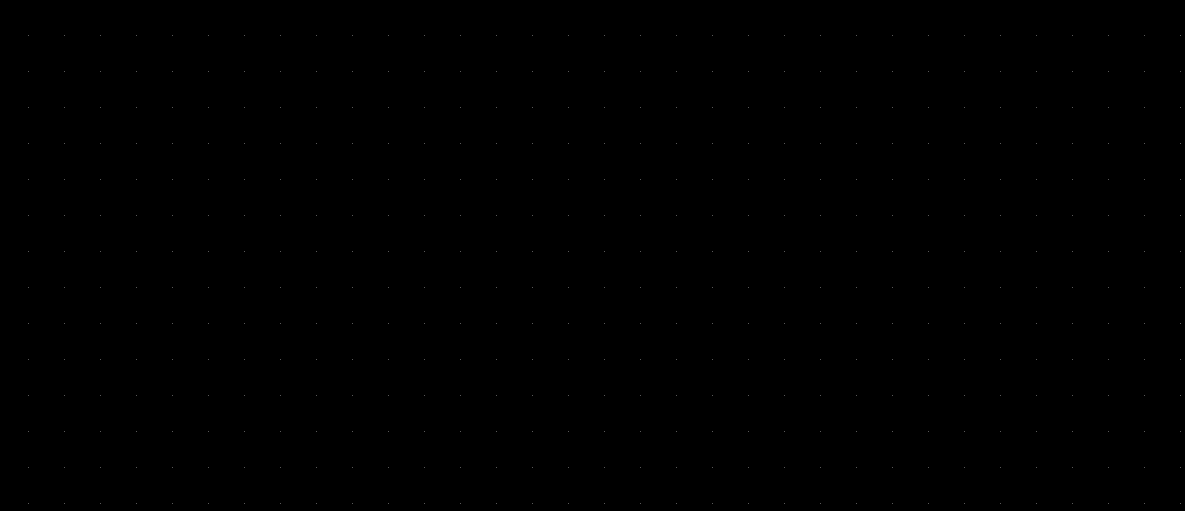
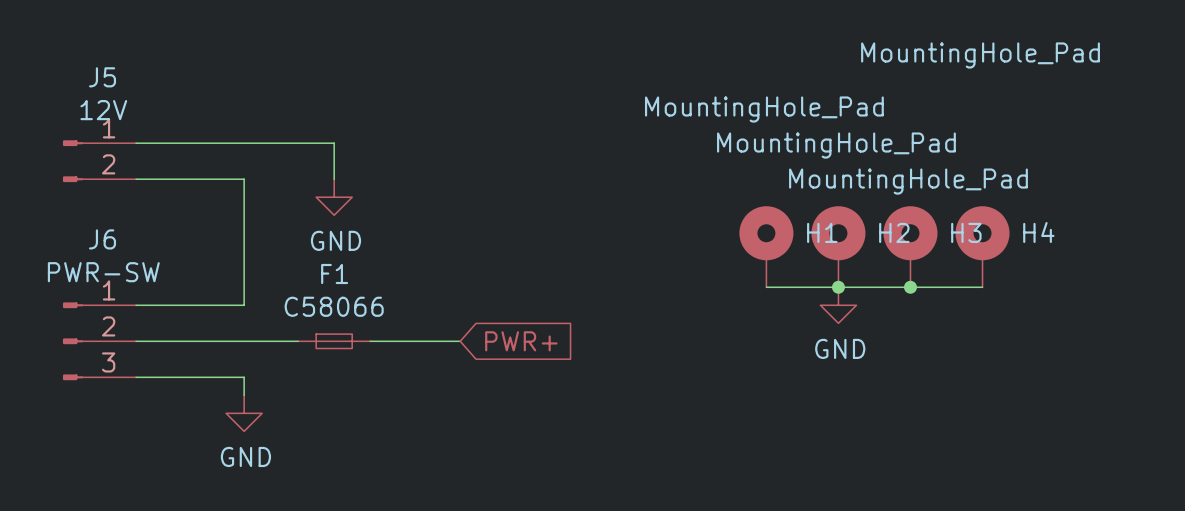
wire: none -> (136, 143) (334, 143) (334, 179)
J5: none -> 12V (99, 161)
wire: none -> (136, 179) (244, 179) (244, 305) (136, 305)
power symbol: none -> GND (334, 197)
H1: none -> MountingHole_Pad (766, 246)
H2: none -> MountingHole_Pad (838, 246)
H3: none -> MountingHole_Pad (910, 246)
H4: none -> MountingHole_Pad (982, 246)
wire: none -> (766, 287) (982, 287)
junction: none -> (838, 287)
junction: none -> (910, 287)
power symbol: none -> GND (838, 305)
J6: none -> PWR-SW (99, 341)
wire: none -> (136, 341) (298, 341)
F1: none -> C58066 (334, 341)
wire: none -> (370, 341) (460, 341)
global label: none -> PWR+ (521, 341)
wire: none -> (136, 377) (244, 377) (244, 395)
power symbol: none -> GND (244, 413)

